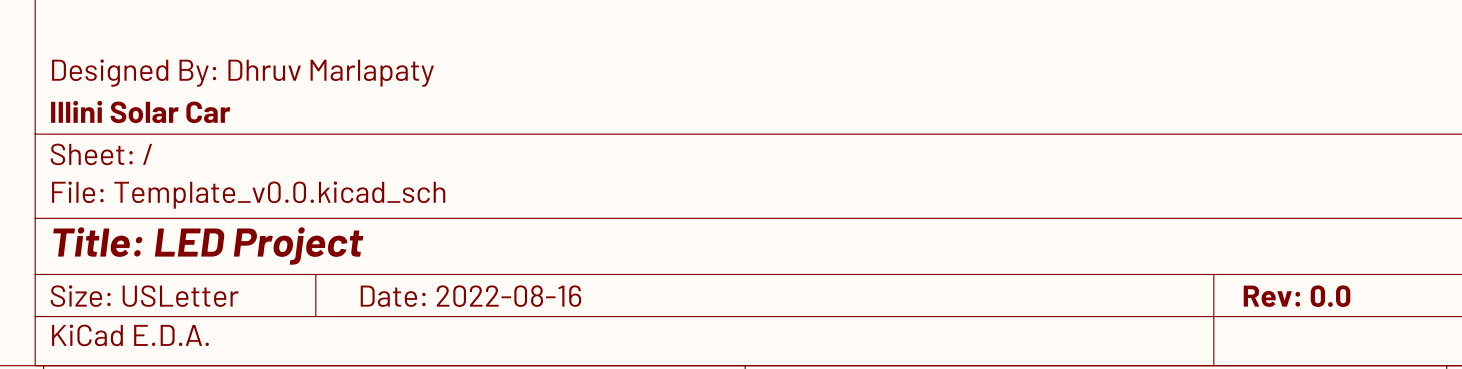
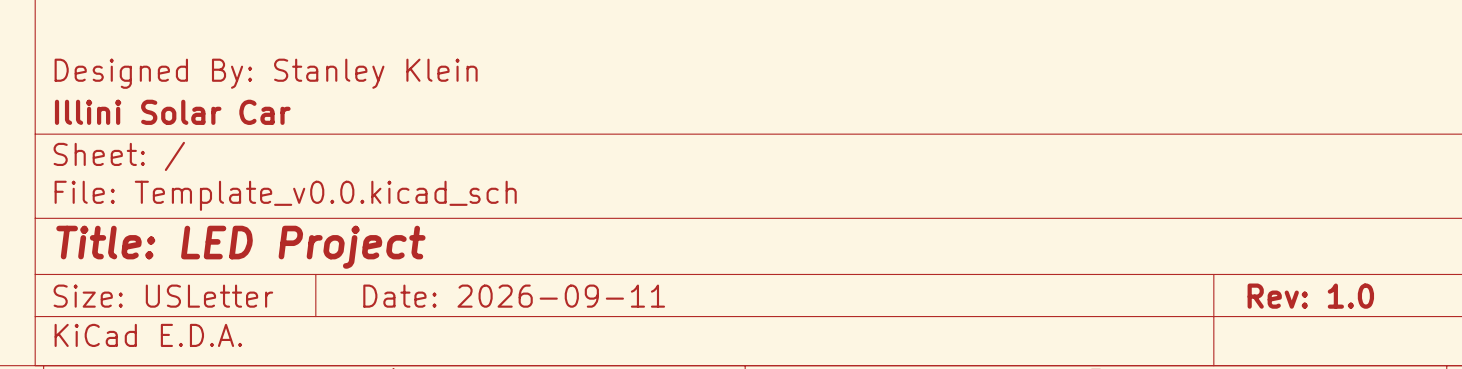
title block: Designed By: Dhruv Marlapaty (242, 73) -> Designed By: Stanley Klein (266, 73)
title block: Date: 2022-08-16 (470, 296) -> Date: 2026-09-11 (514, 296)
title block: Rev: 0.0 (1297, 296) -> Rev: 1.0 (1310, 296)

